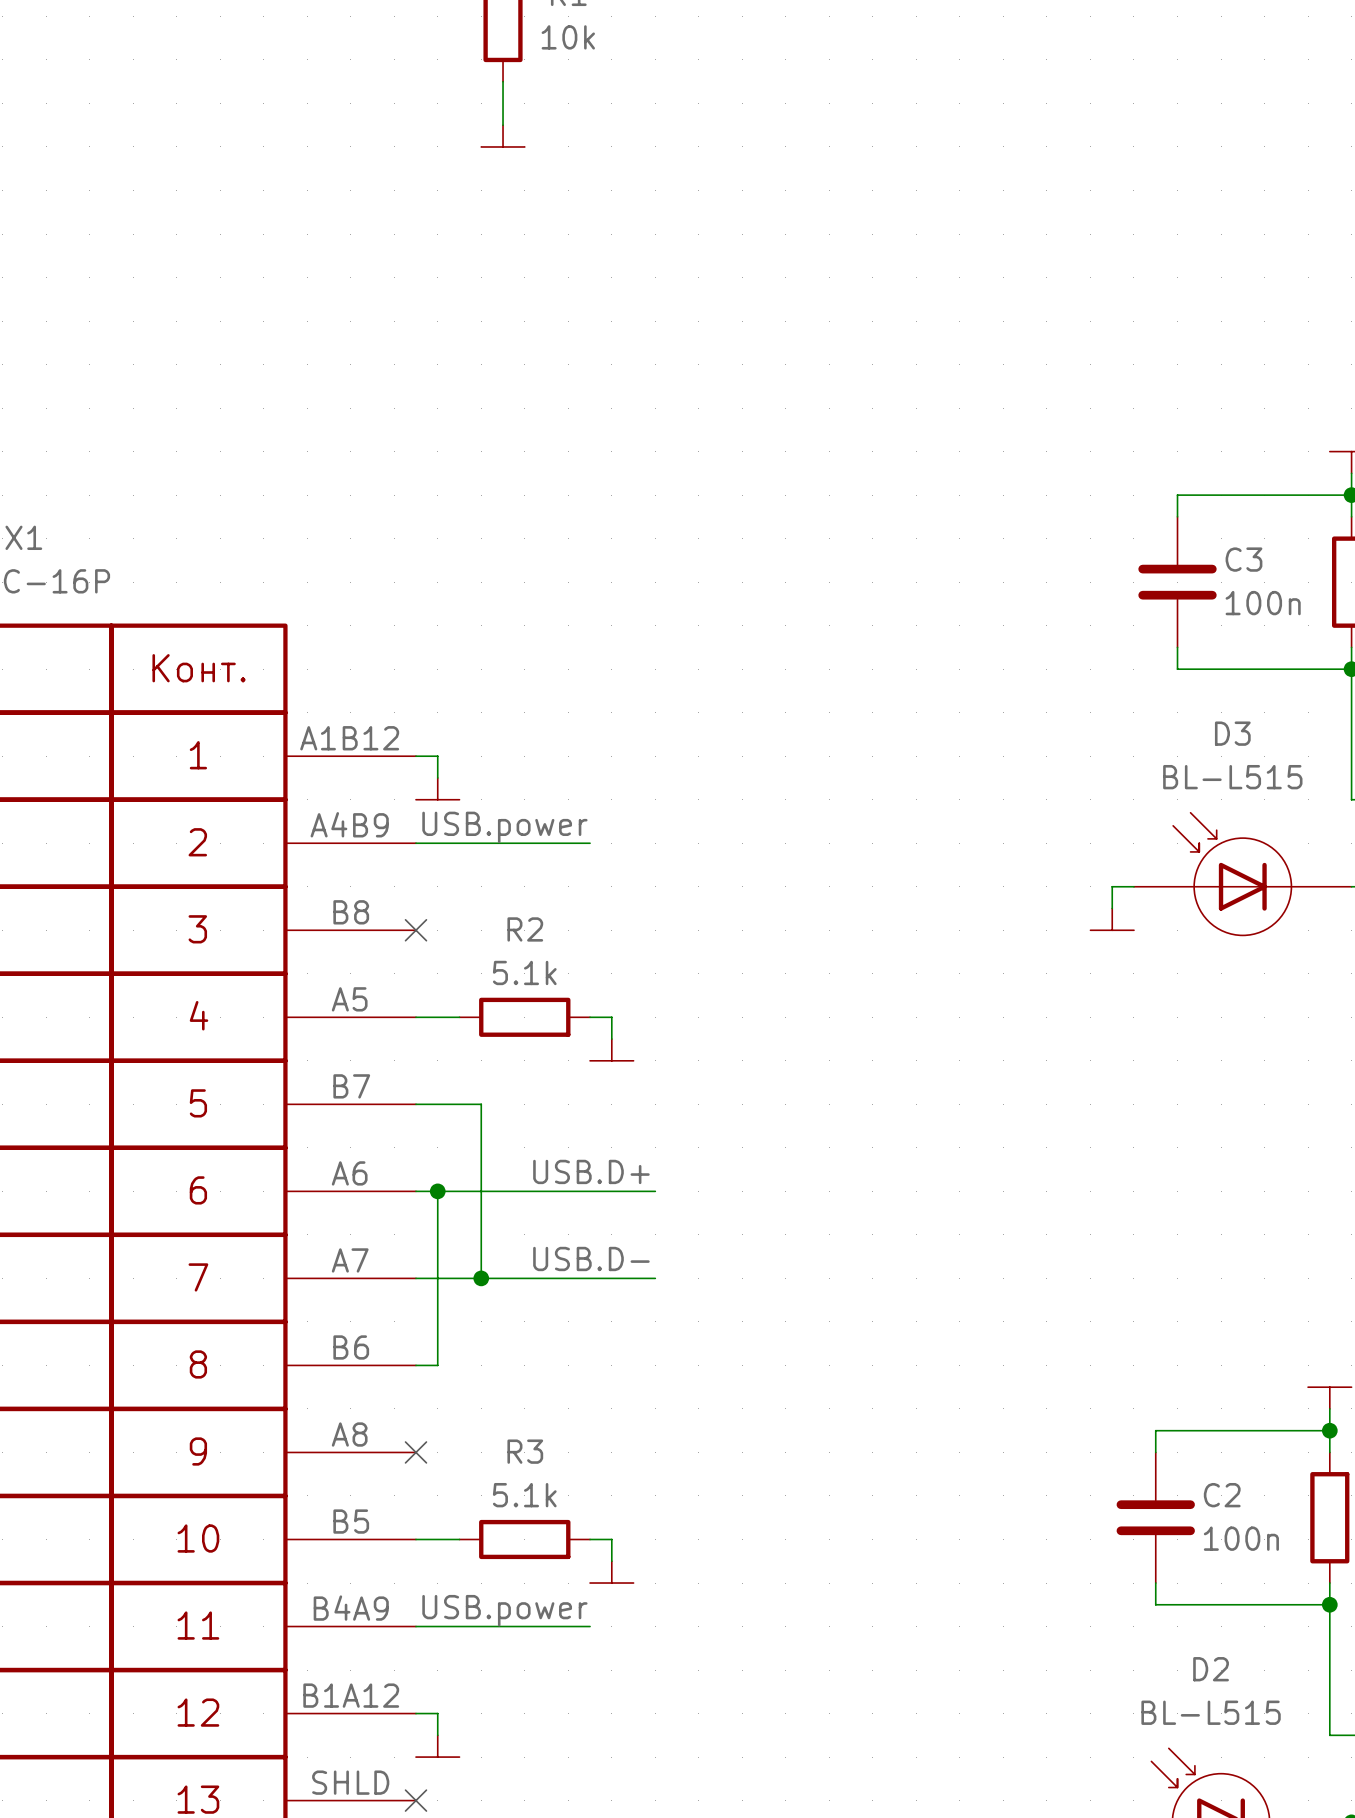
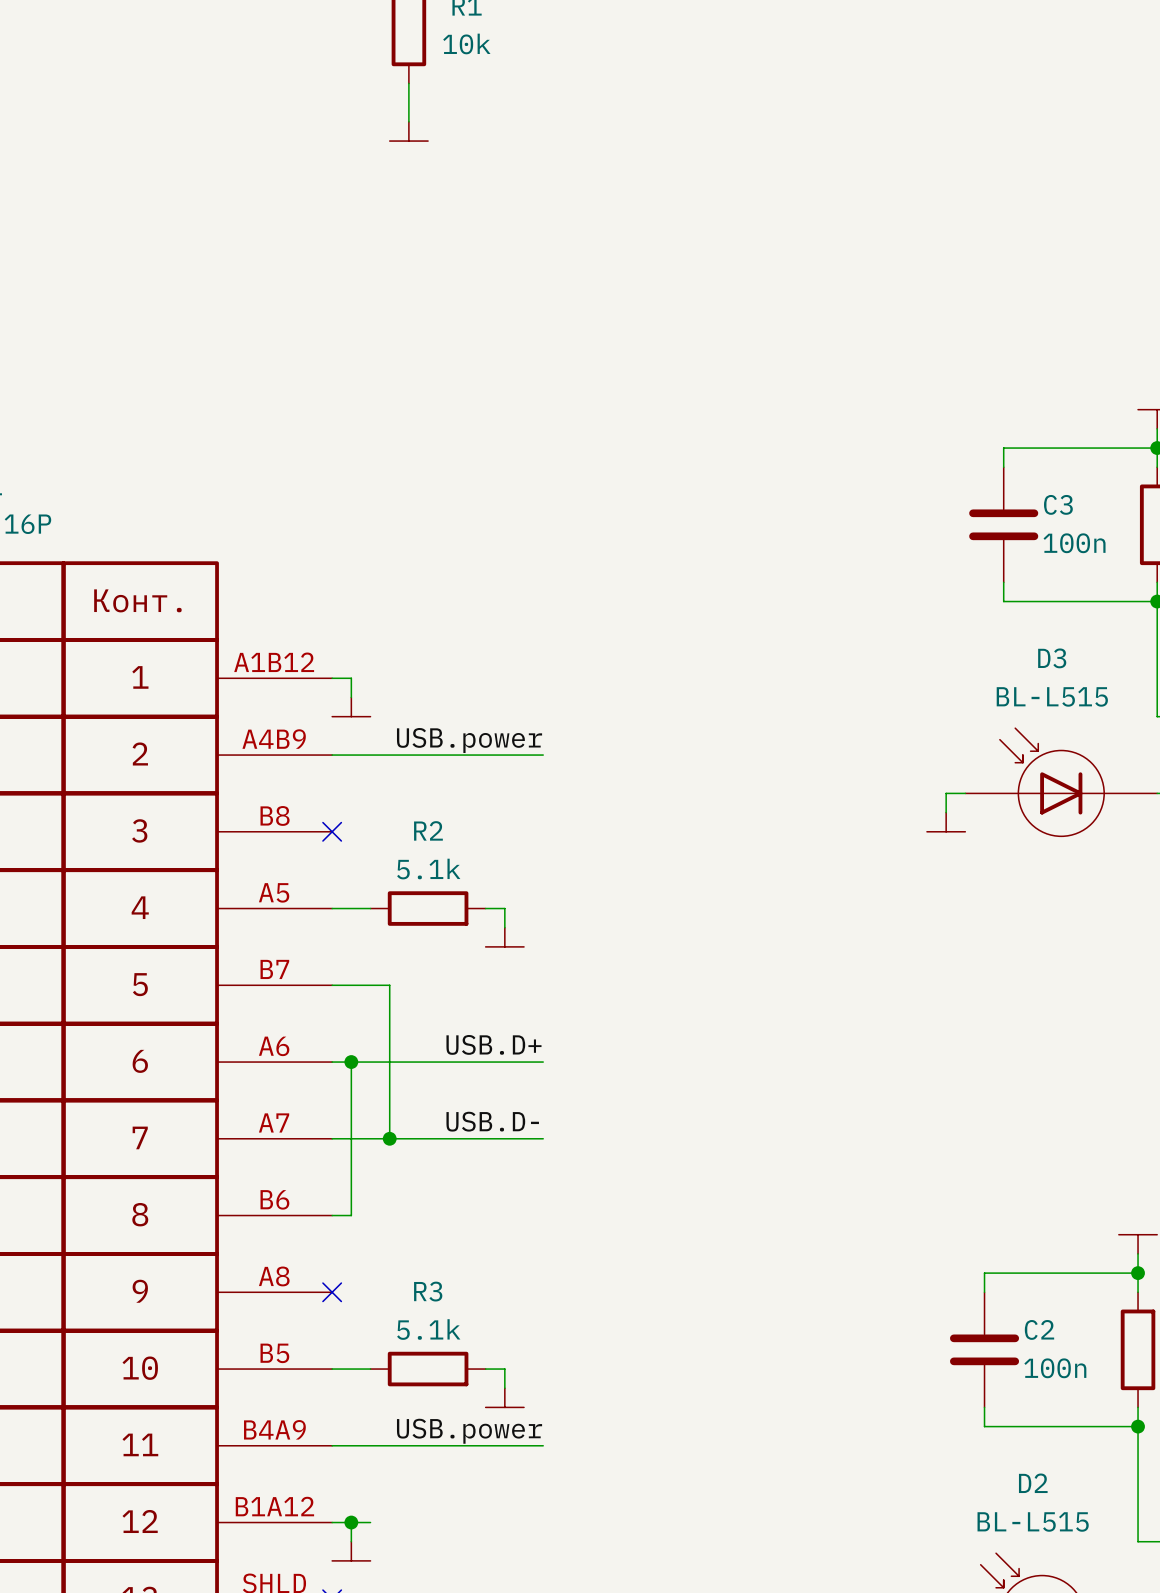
label position: USB.power (504, 827) -> USB.power (469, 740)
wire: none -> (485, 755) (543, 755)
label position: USB.power (504, 1610) -> USB.power (469, 1431)
wire: none -> (485, 1445) (543, 1445)
wire: none -> (351, 1522) (370, 1522)
junction: none -> (351, 1522)

